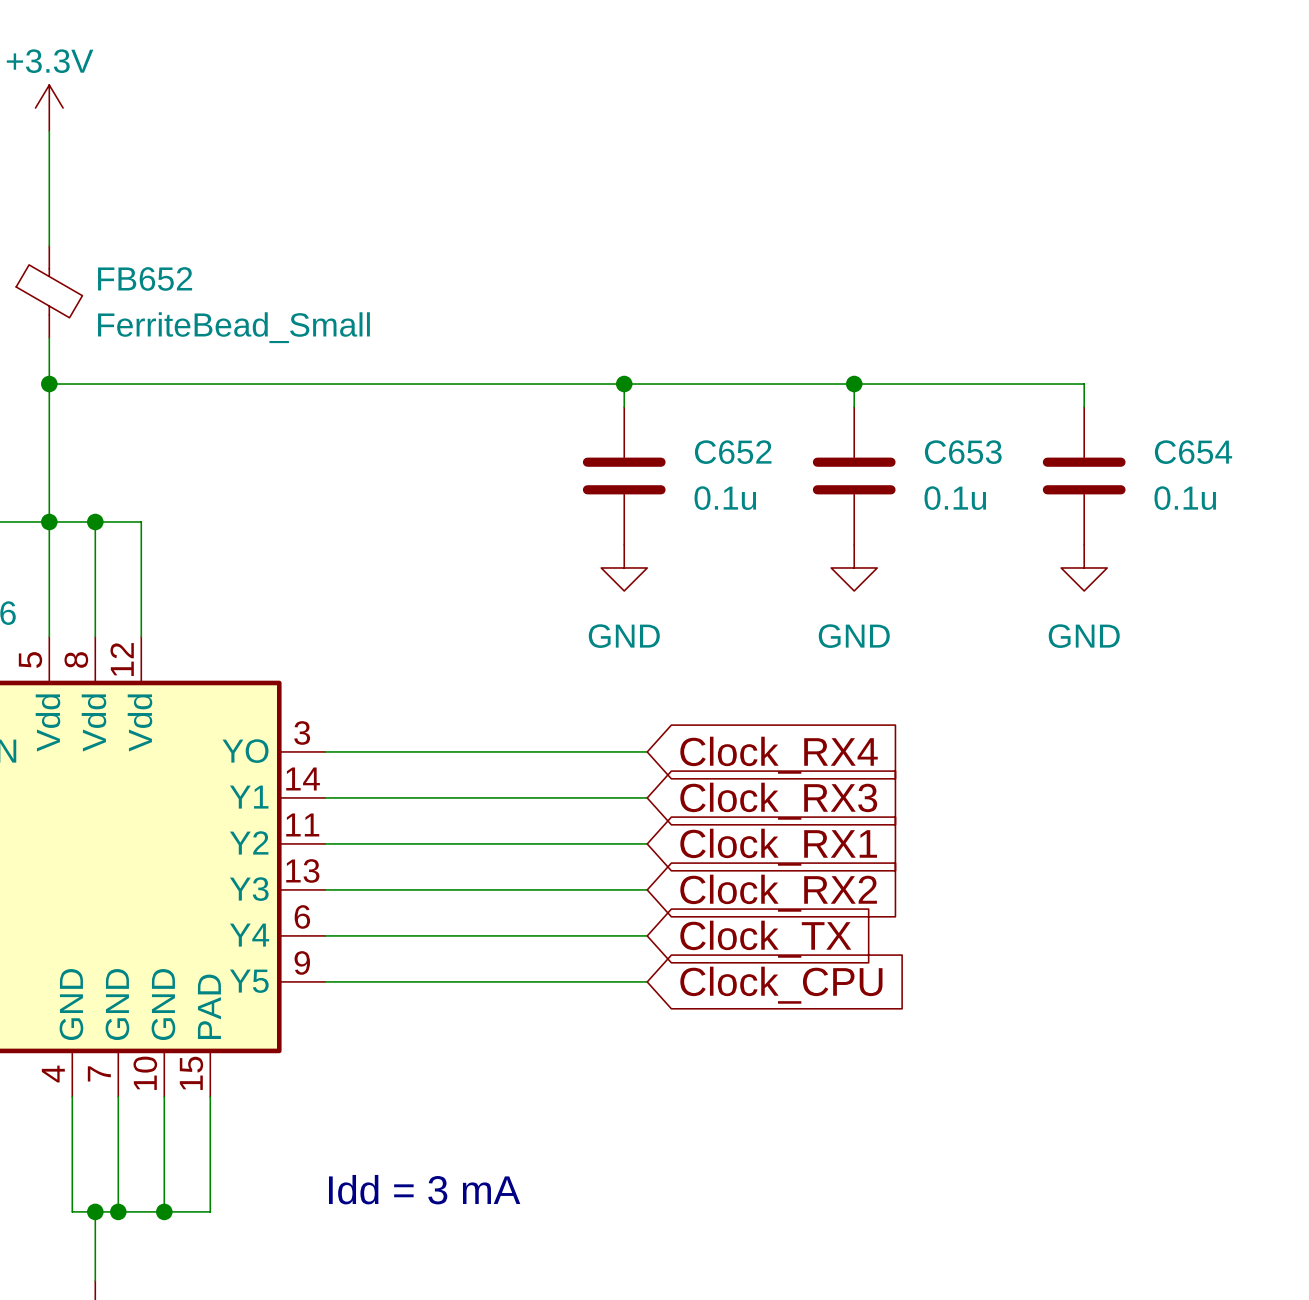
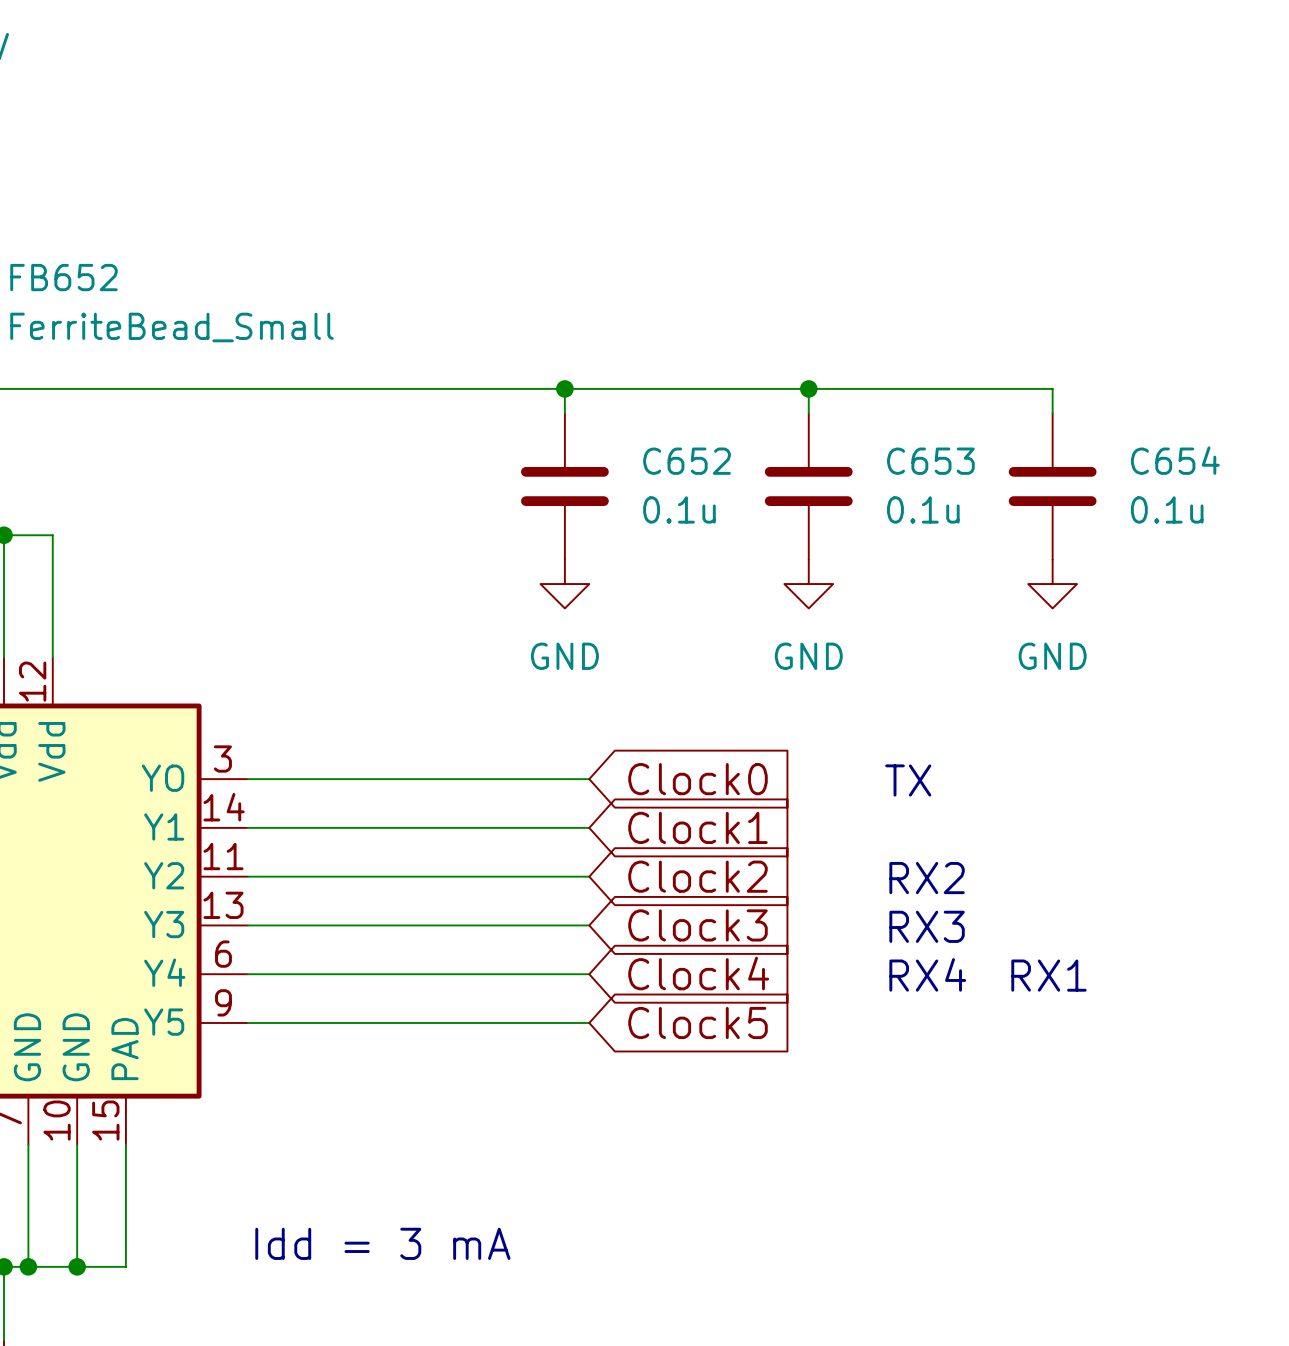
text: none -> TX (908, 780)
global label: Clock_RX4 (779, 755) -> Clock0 (697, 779)
global label: Clock_RX3 (778, 801) -> Clock1 (697, 827)
text: none -> RX2 (927, 878)
global label: Clock_RX1 (778, 847) -> Clock2 (697, 876)
text: none -> RX3 (927, 926)
global label: Clock_RX2 (778, 893) -> Clock3 (697, 925)
text: none -> RX4 (927, 974)
text: none -> RX1 (1048, 975)
global label: Clock_TX (765, 939) -> Clock4 (698, 973)
global label: Clock_CPU (781, 985) -> Clock5 (697, 1022)

